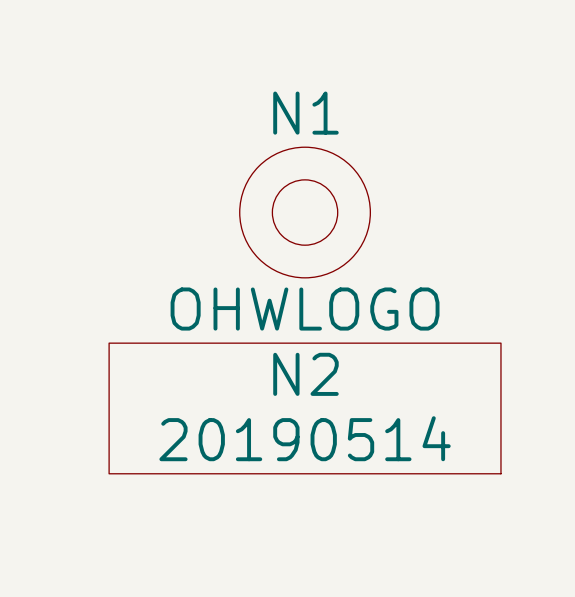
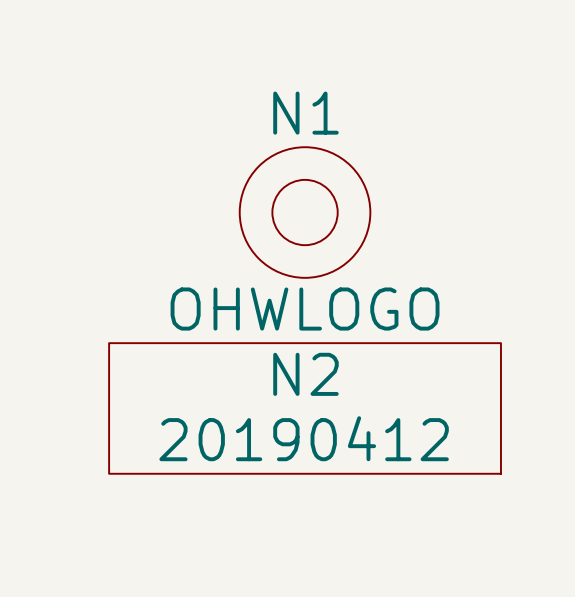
N2 value: 20190514 (305, 438) -> 20190412 (304, 438)

